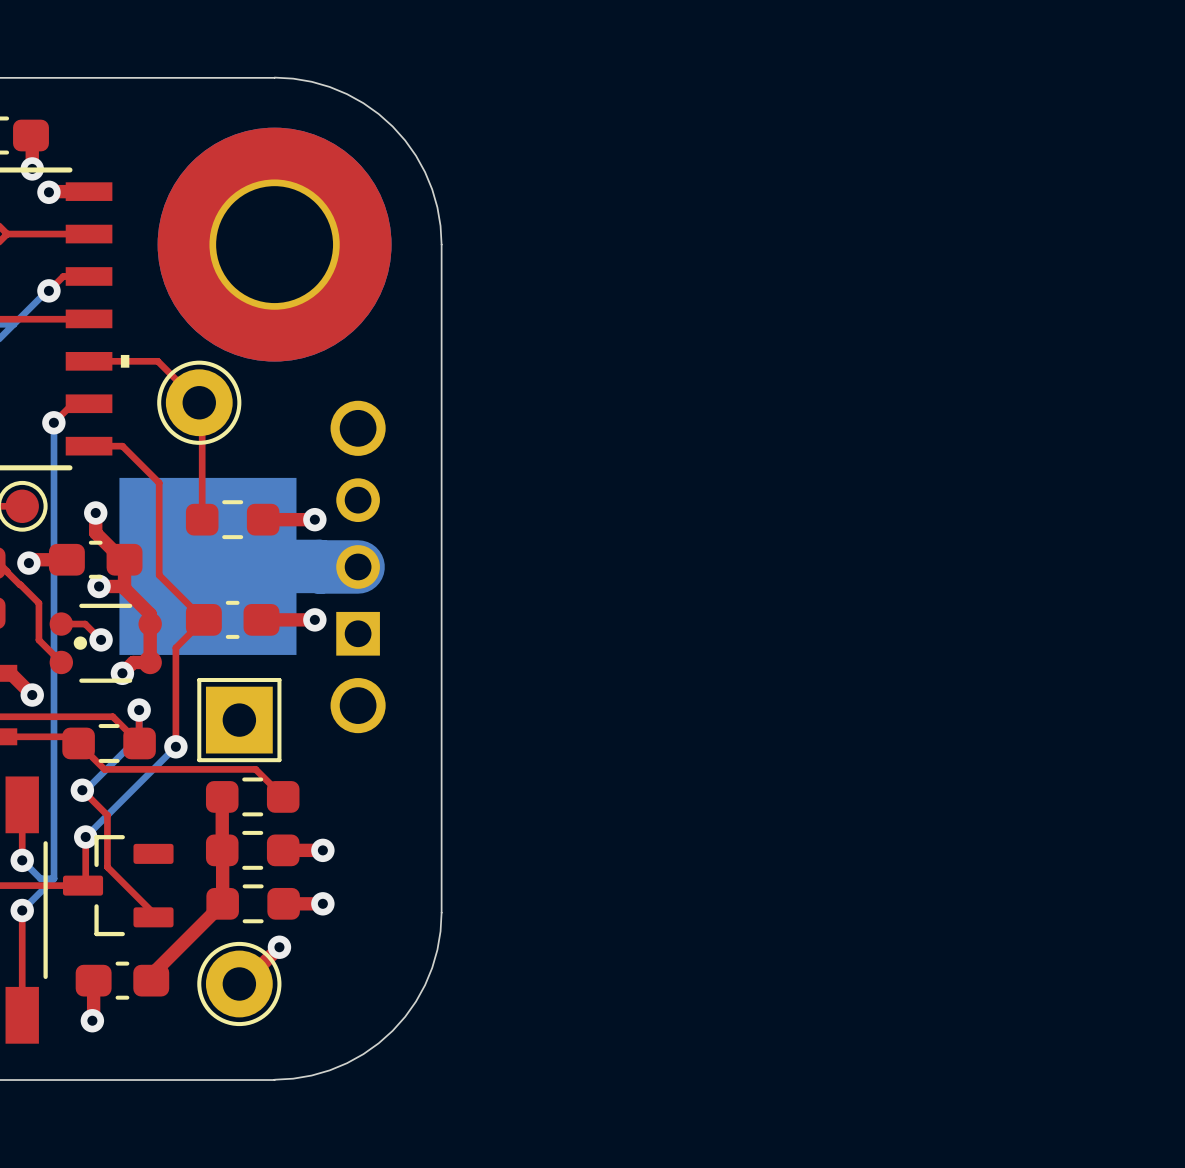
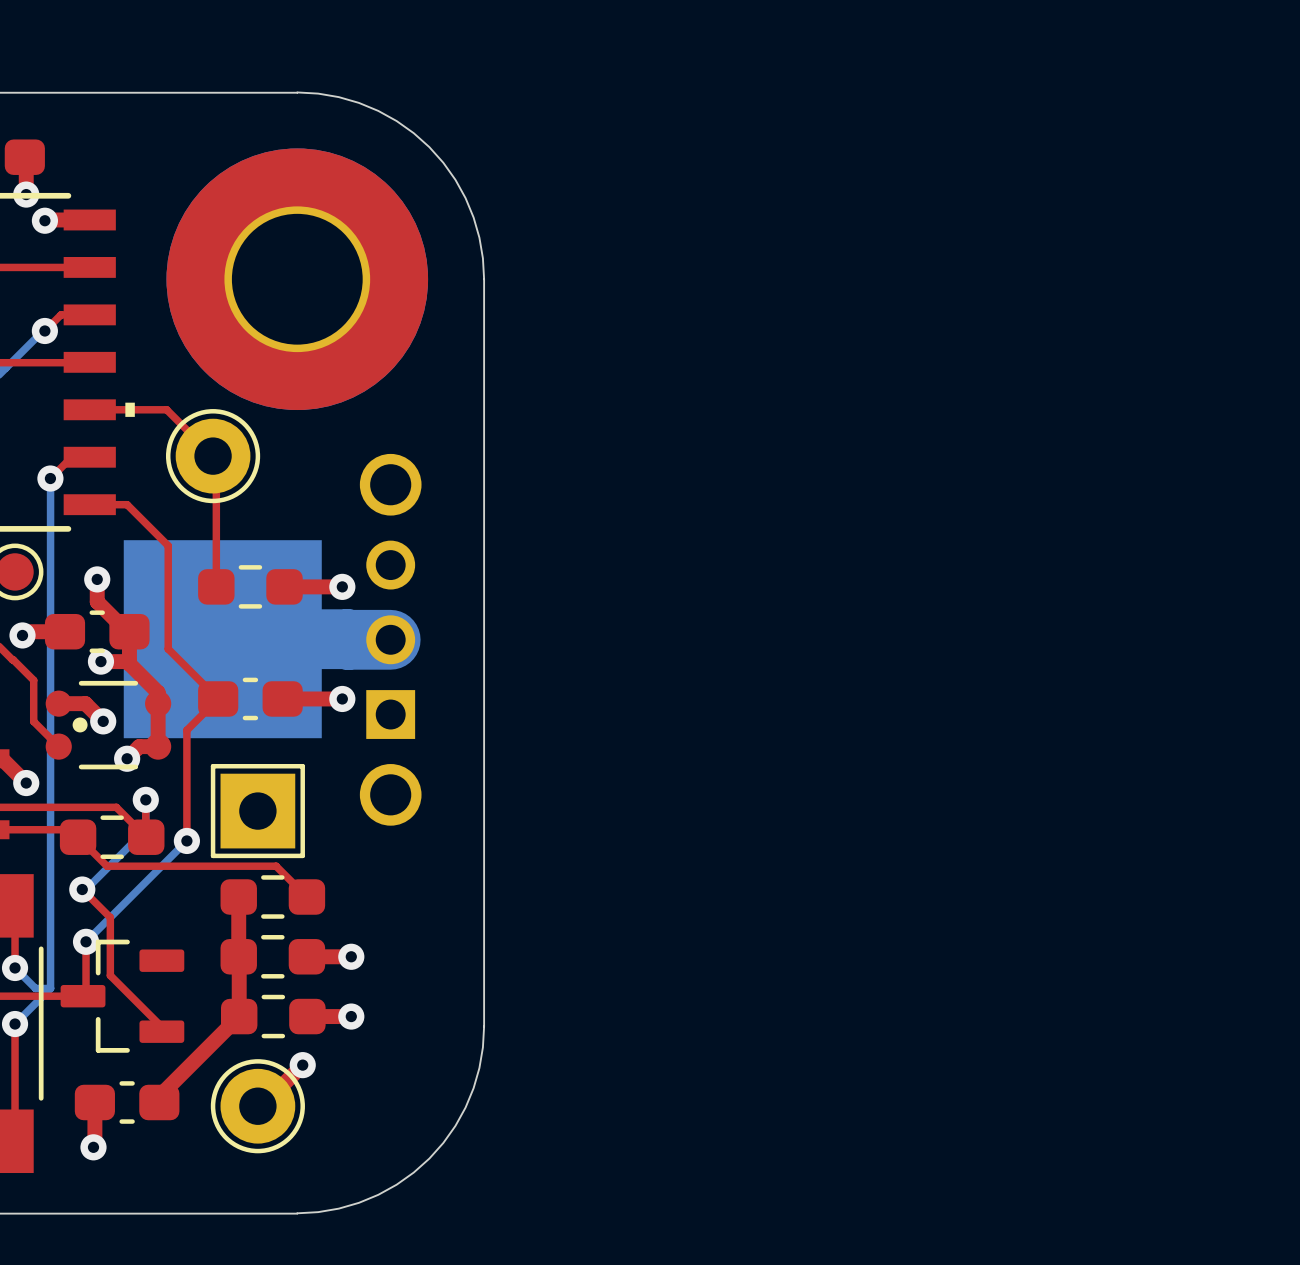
top track width: thin (61, 624) (85, 624) (101, 639) -> thick (58, 703) (85, 703) (103, 721)

